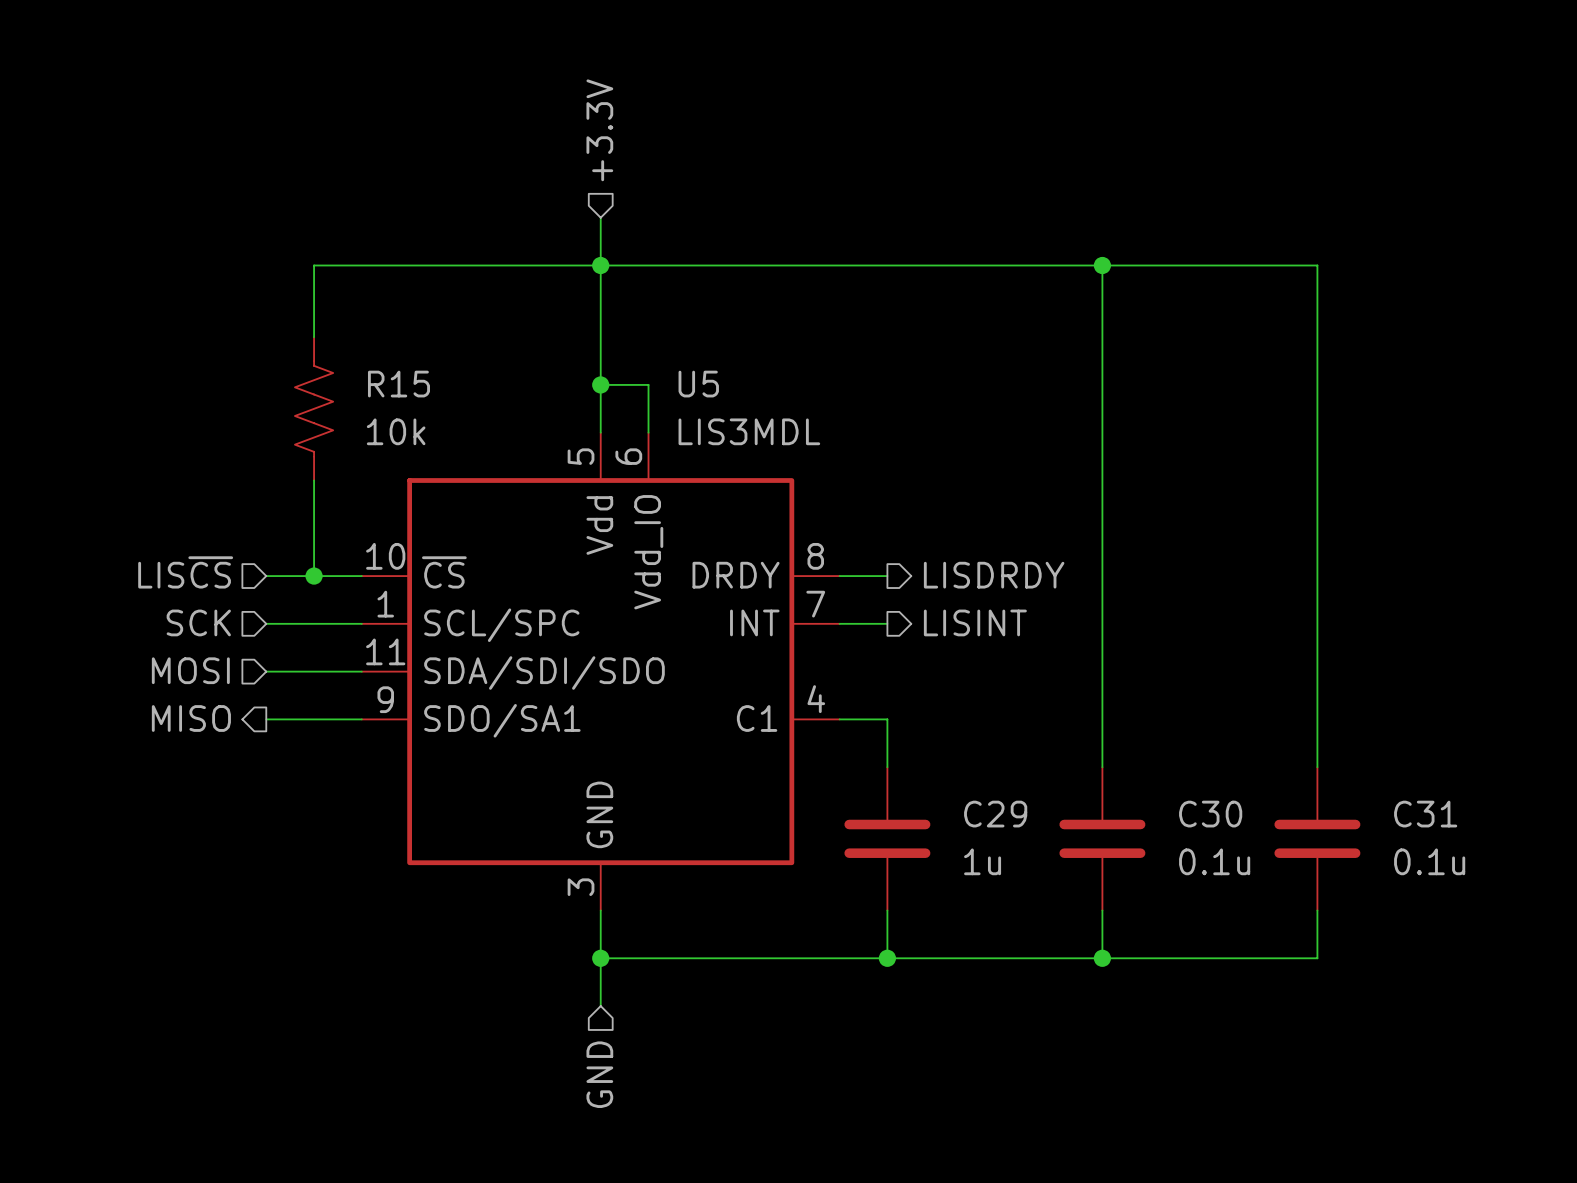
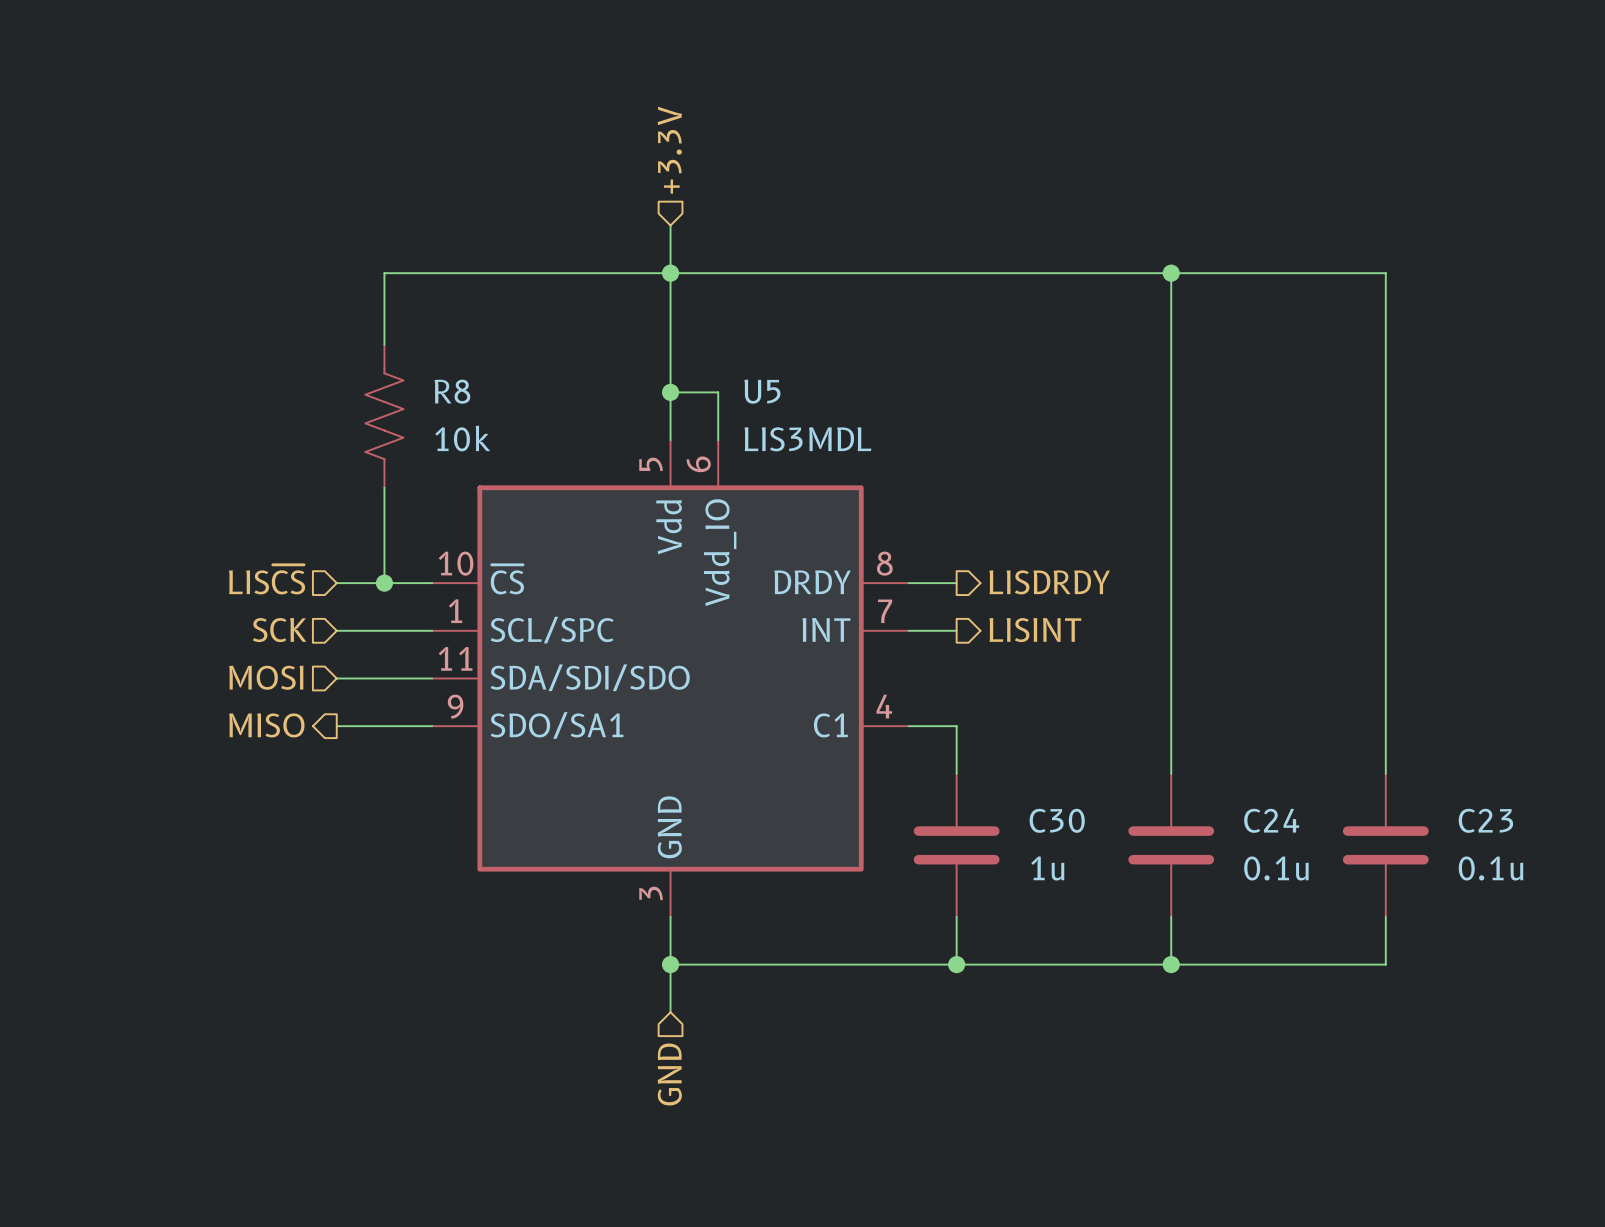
R15 name: R15 (398, 384) -> R8 (452, 391)
C29 name: C29 (995, 814) -> C30 (1057, 820)
C30 name: C30 (1210, 814) -> C24 (1271, 820)
C31 name: C31 (1425, 814) -> C23 (1485, 820)

